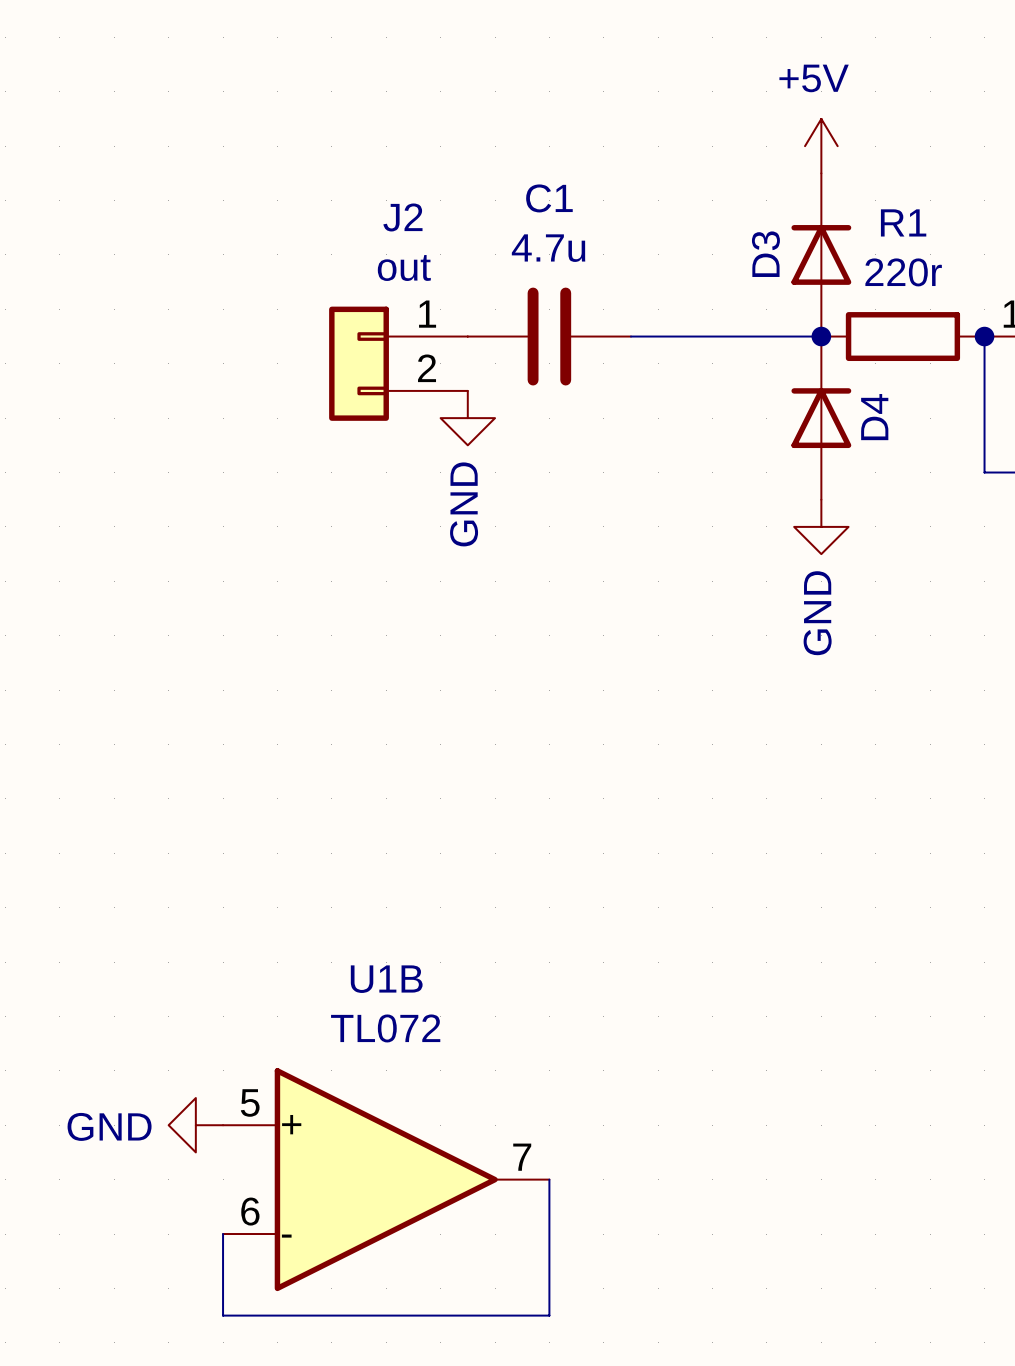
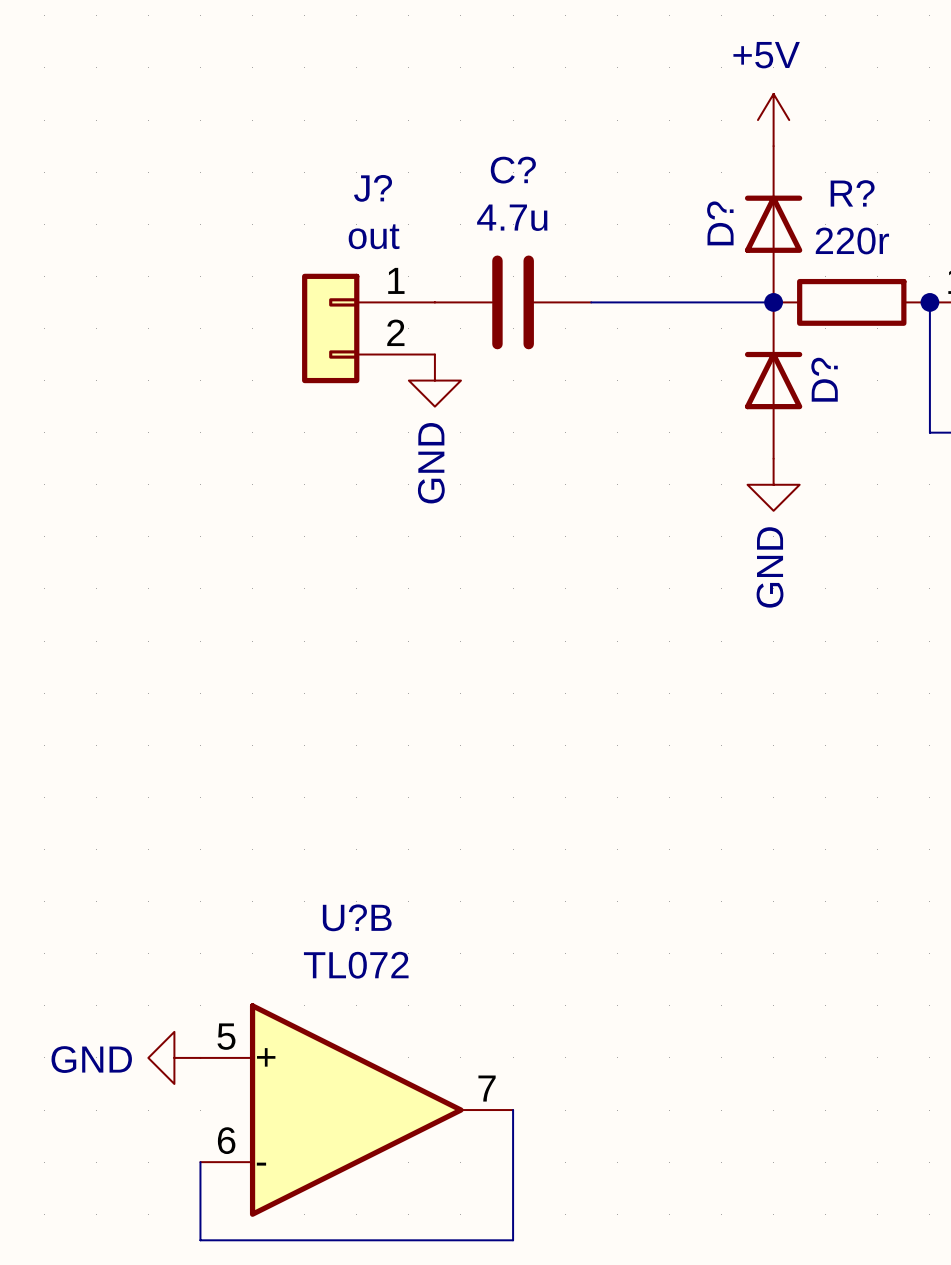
C1 name: C1 (549, 198) -> C? (513, 170)
J2 name: J2 (402, 217) -> J? (373, 188)
R1 name: R1 (903, 222) -> R? (852, 193)
D3 name: D3 (765, 254) -> D? (720, 223)
D4 name: D4 (874, 417) -> D? (824, 379)
U1B name: U1B (386, 979) -> U?B (357, 917)

